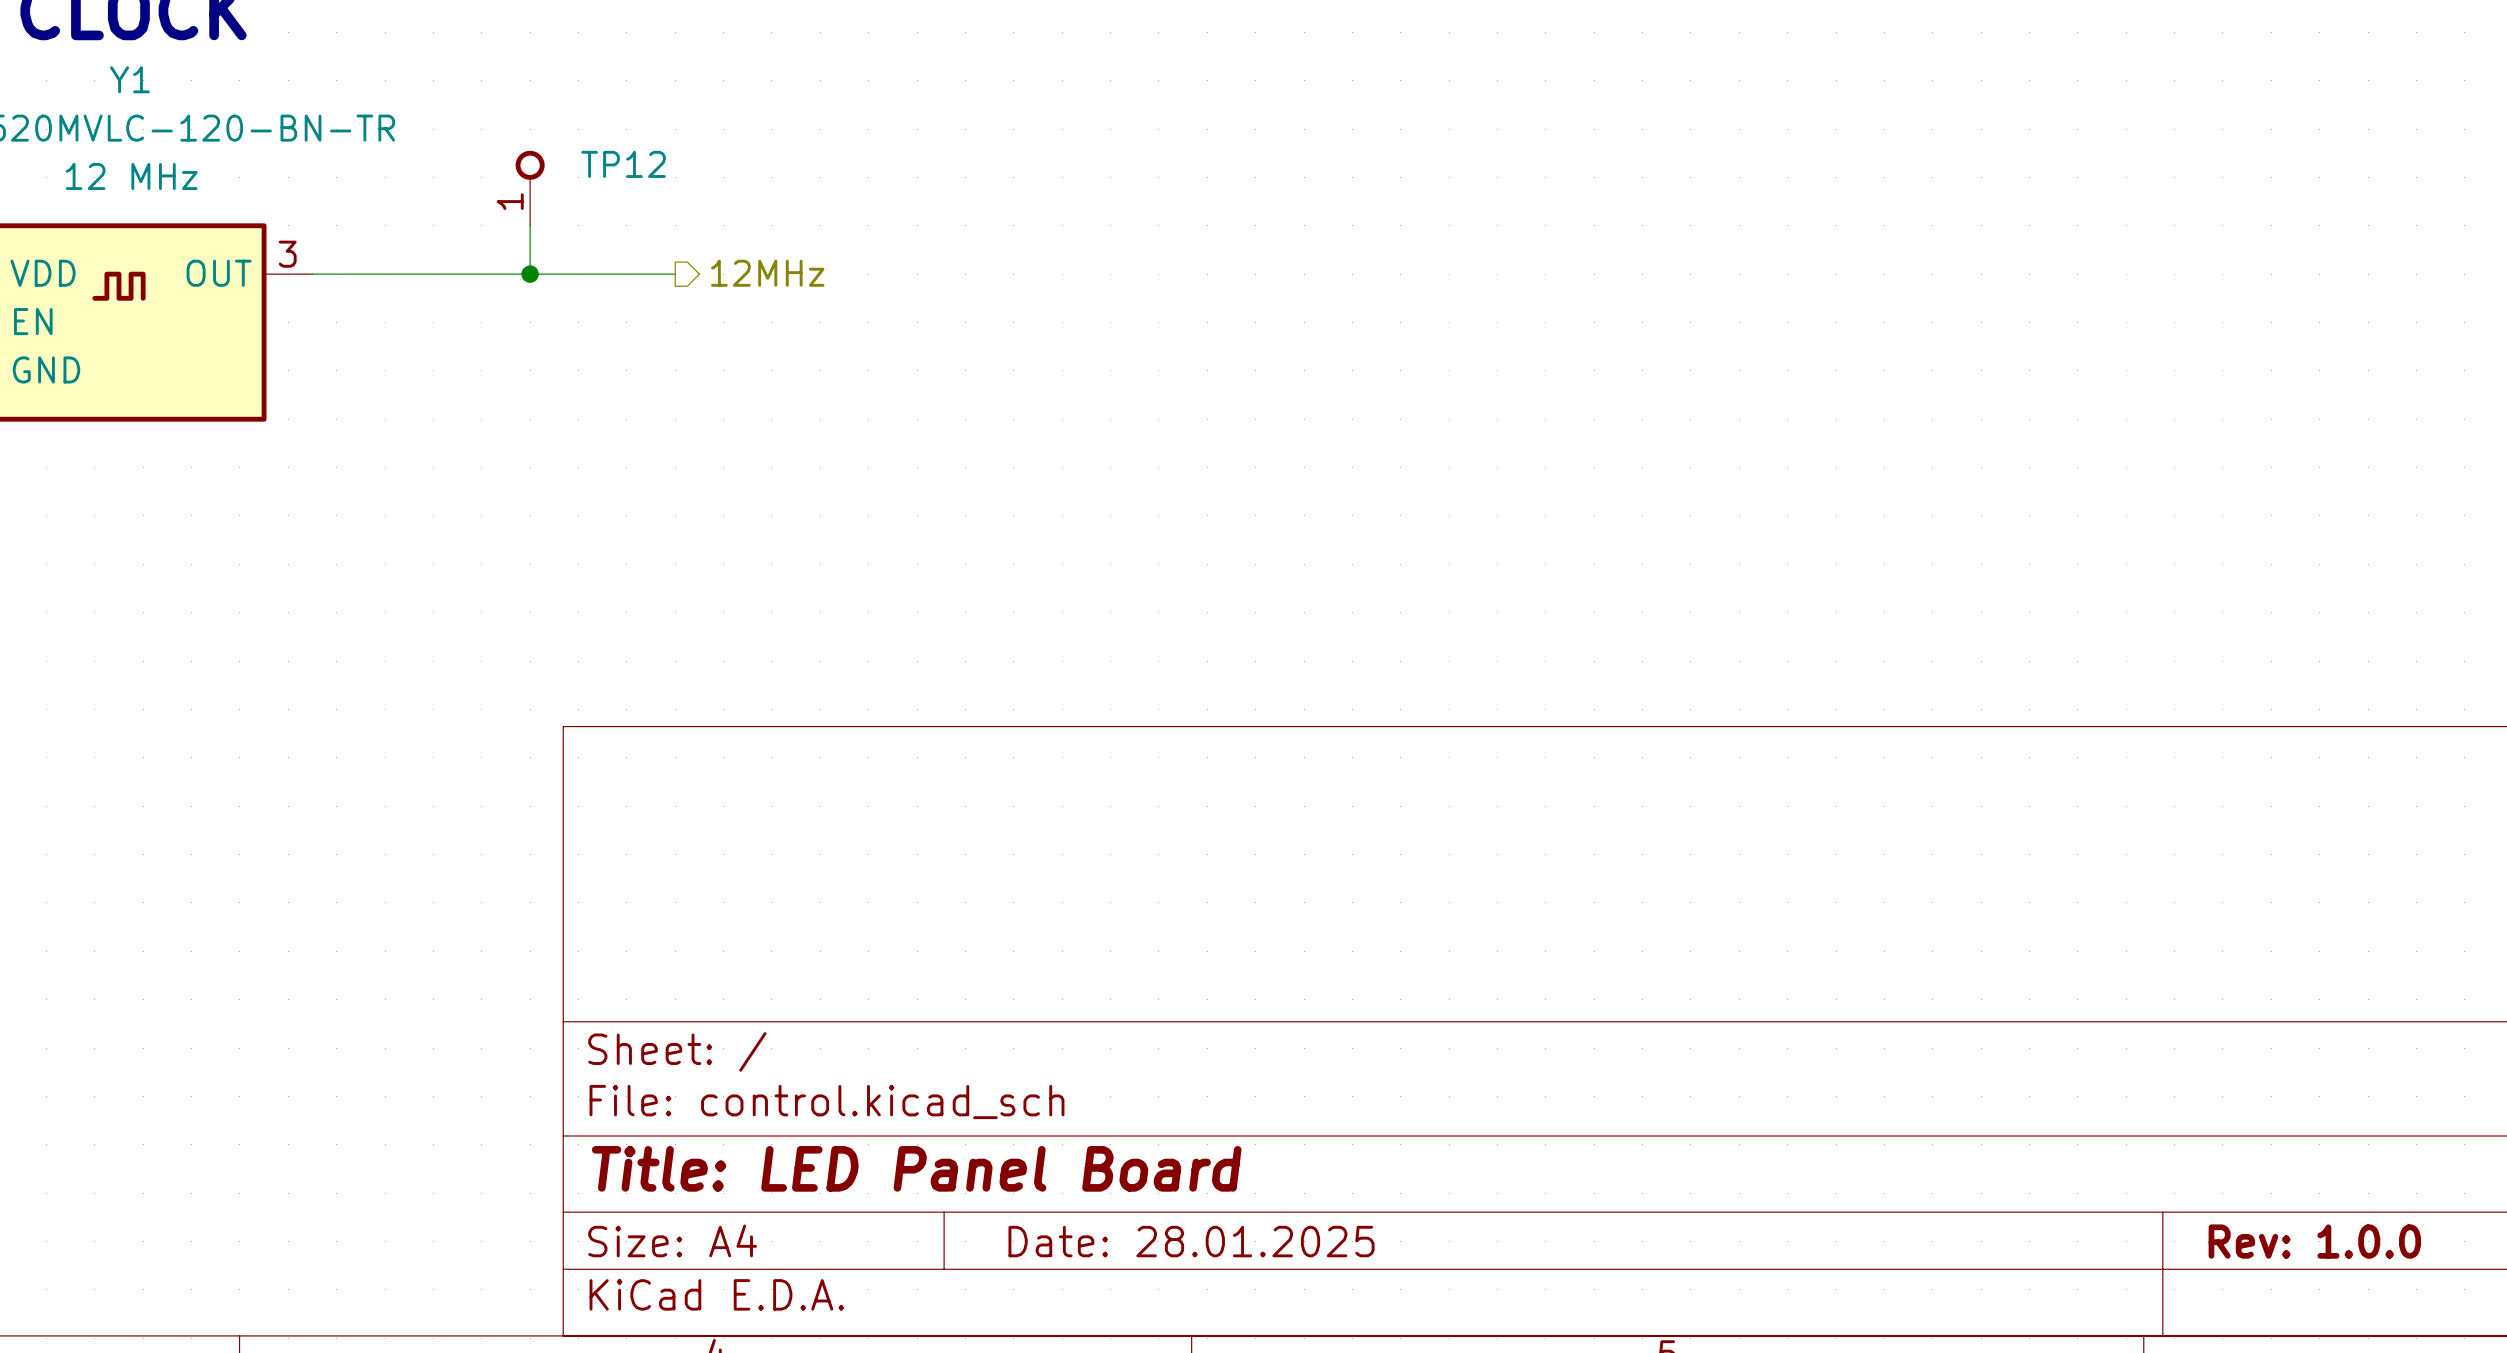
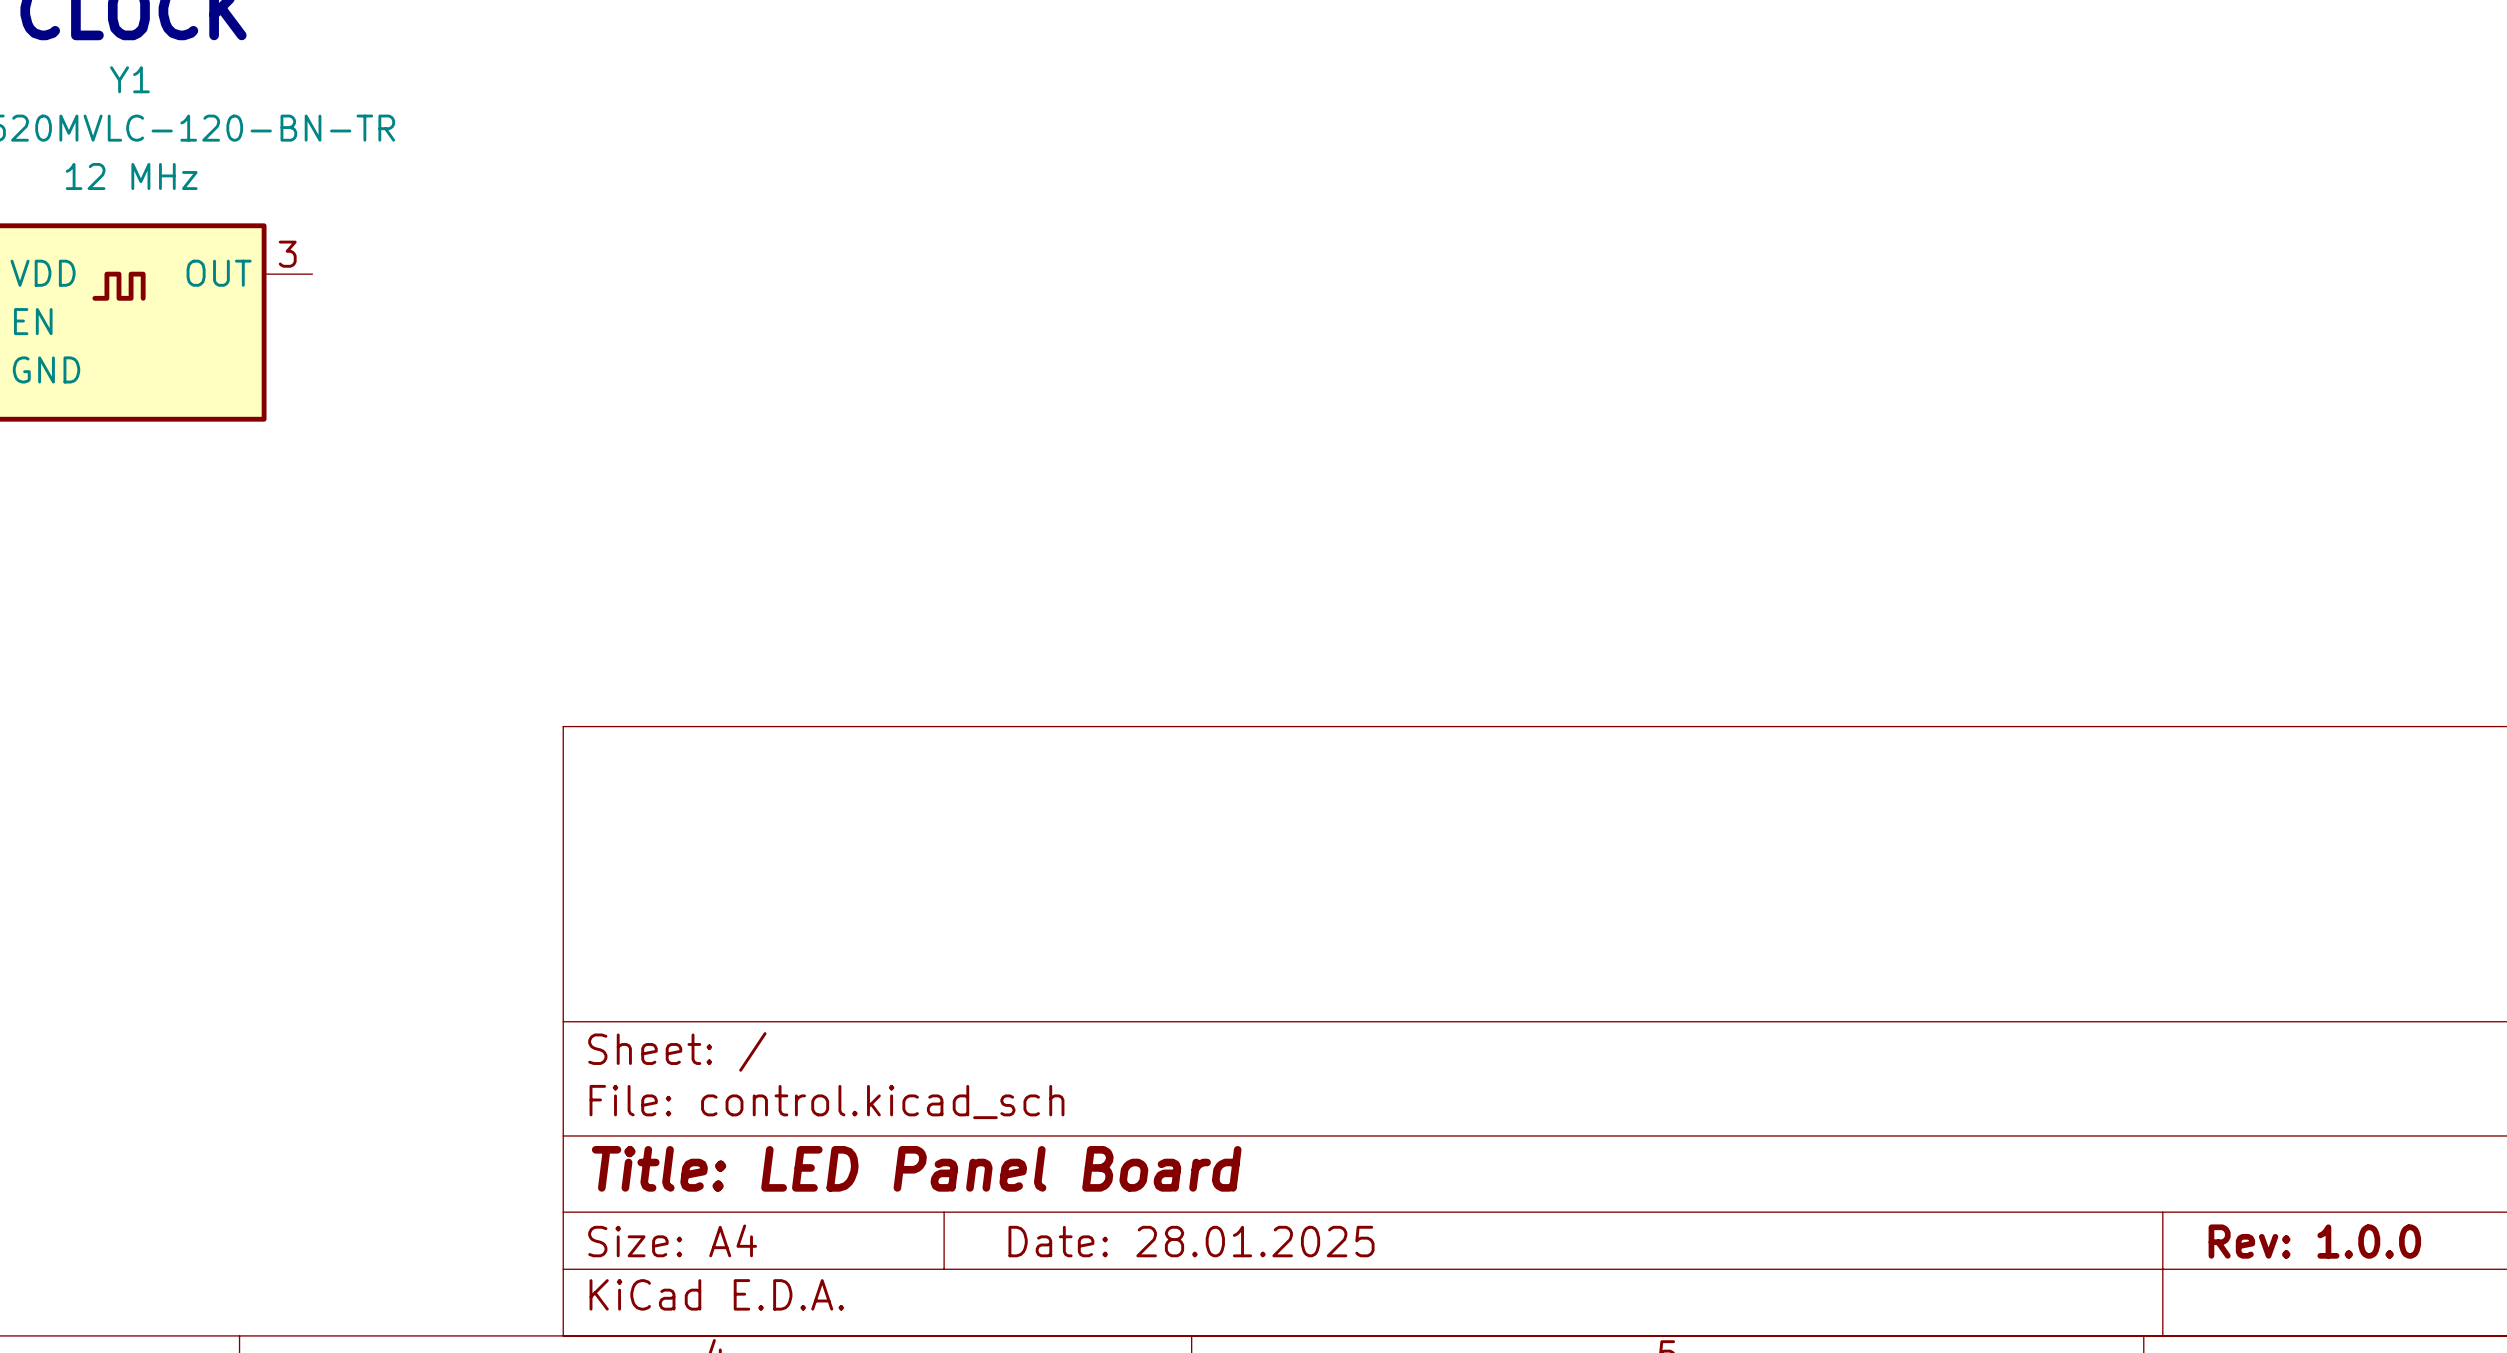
TP12: (530, 188) -> none
wire: (530, 225) (530, 274) -> none
hierarchical label: 12MHz (767, 273) -> none
wire: (312, 274) (675, 274) -> none
junction: (530, 274) -> none

